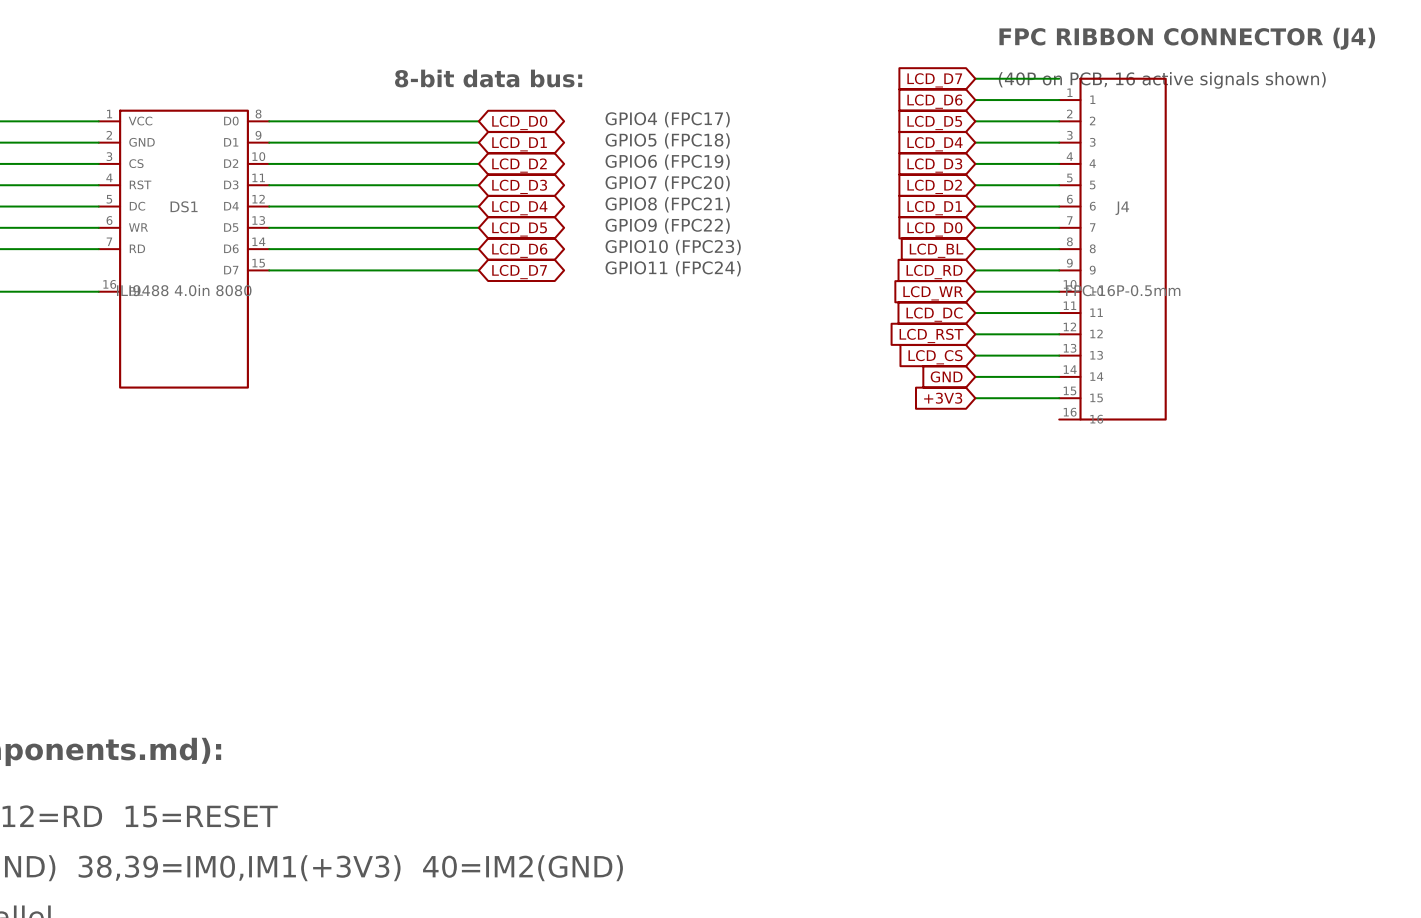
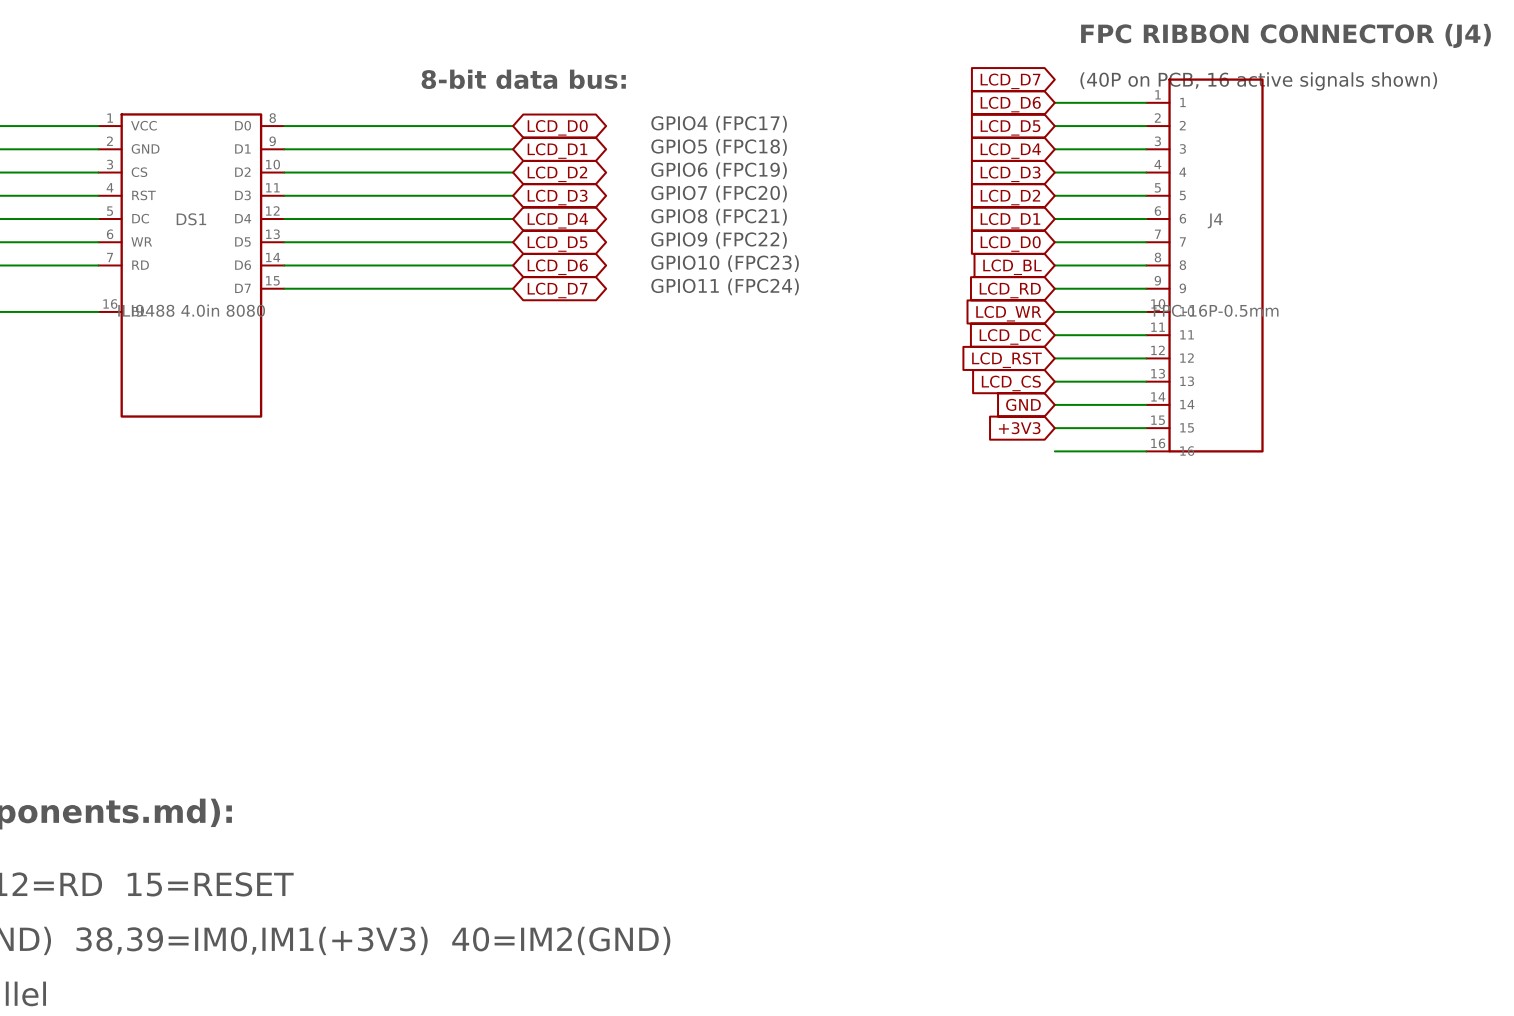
wire: (975, 78) (1059, 78) -> none
wire: none -> (1054, 451) (1146, 451)

